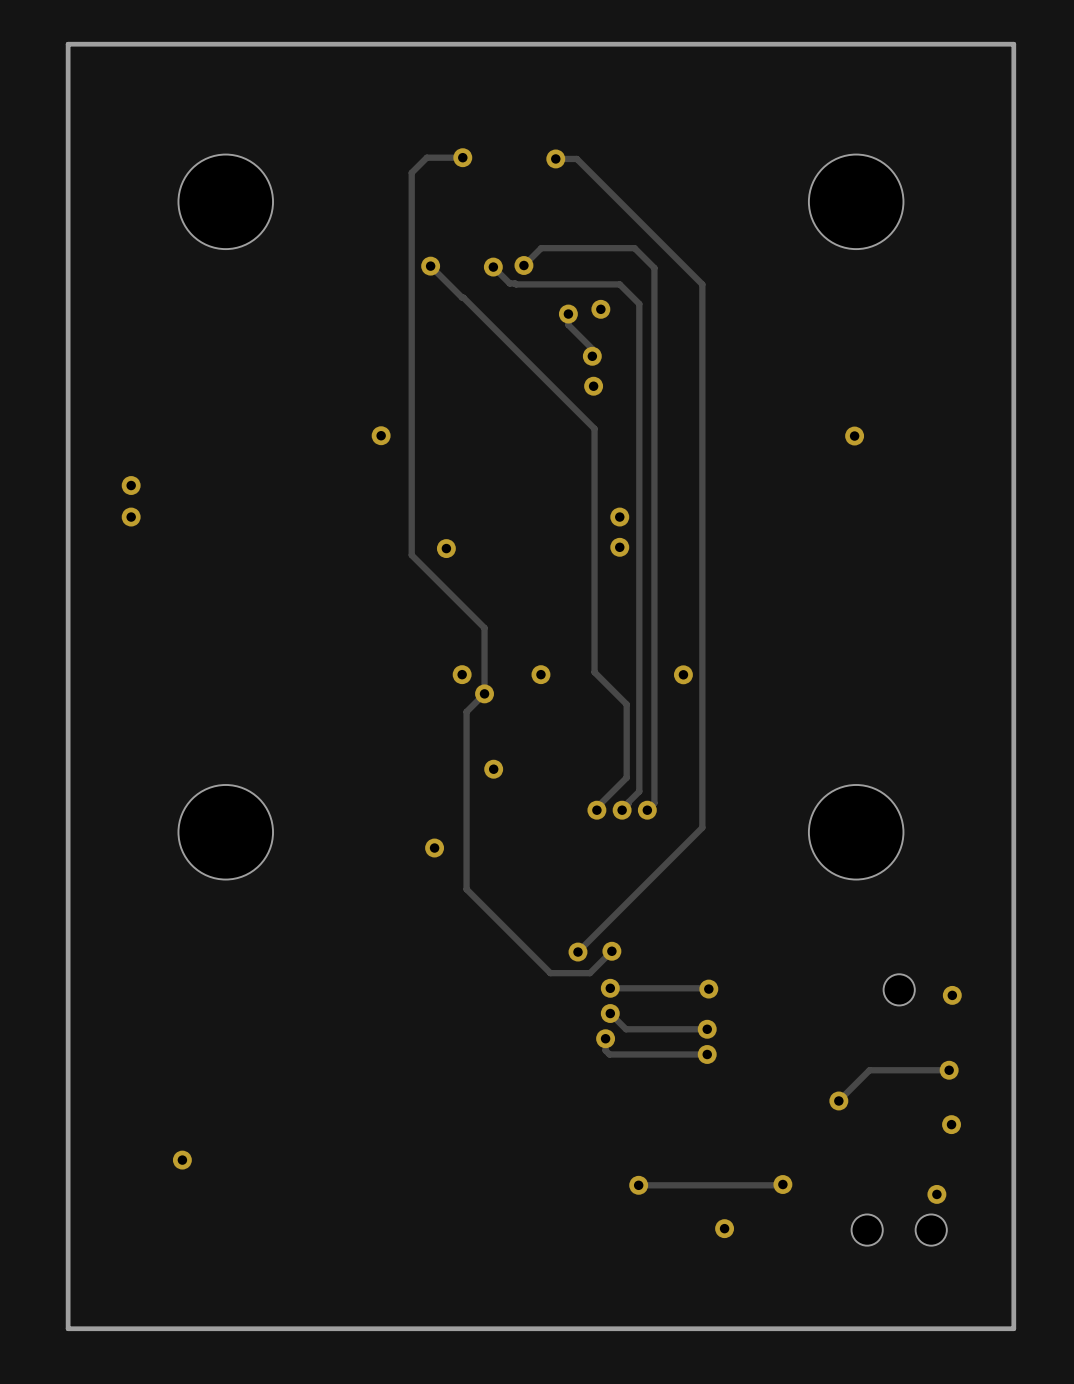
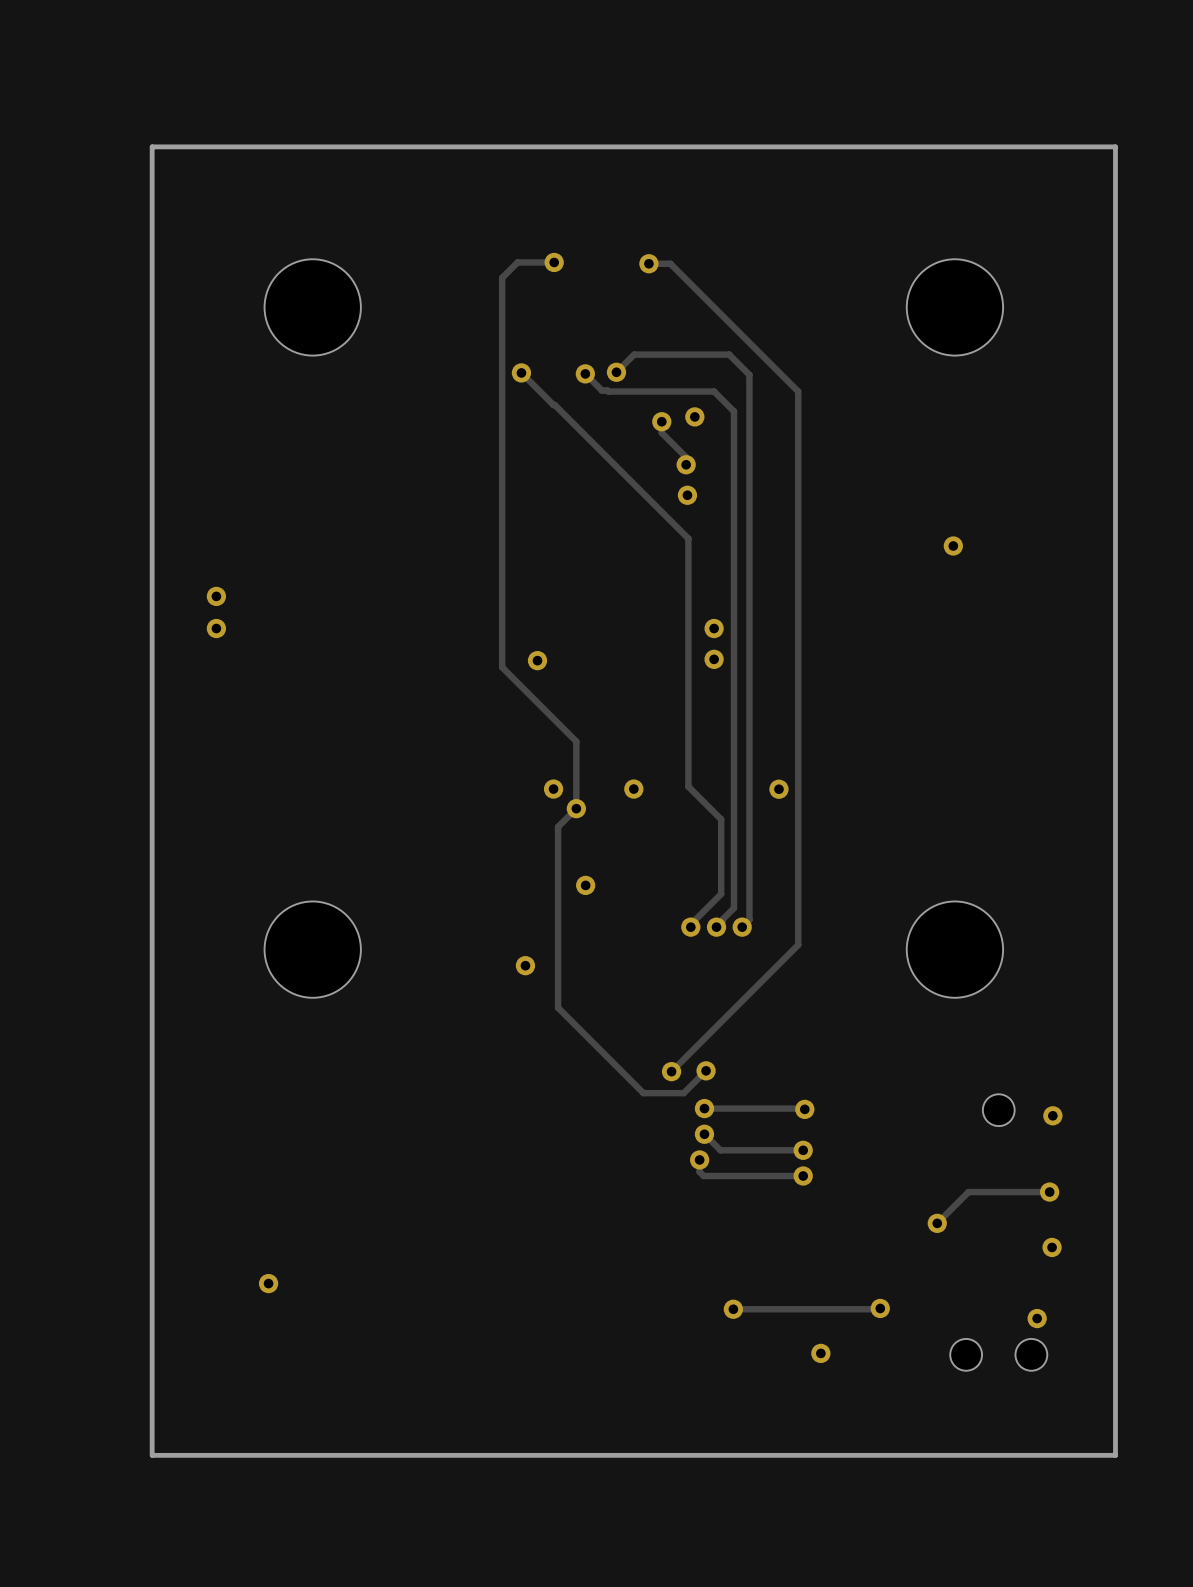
via: (381, 435) -> none

